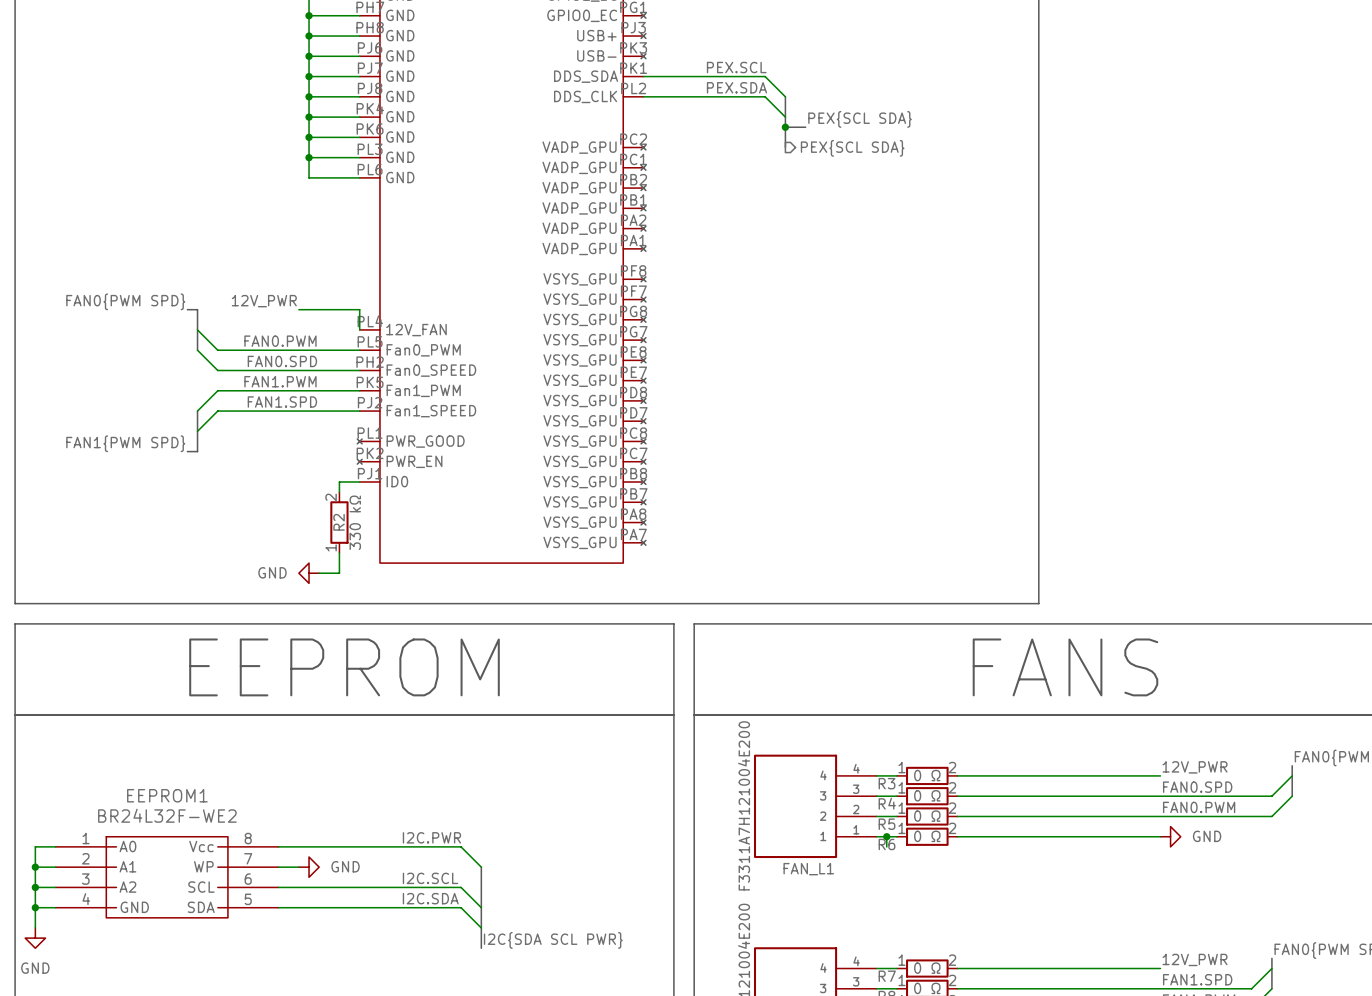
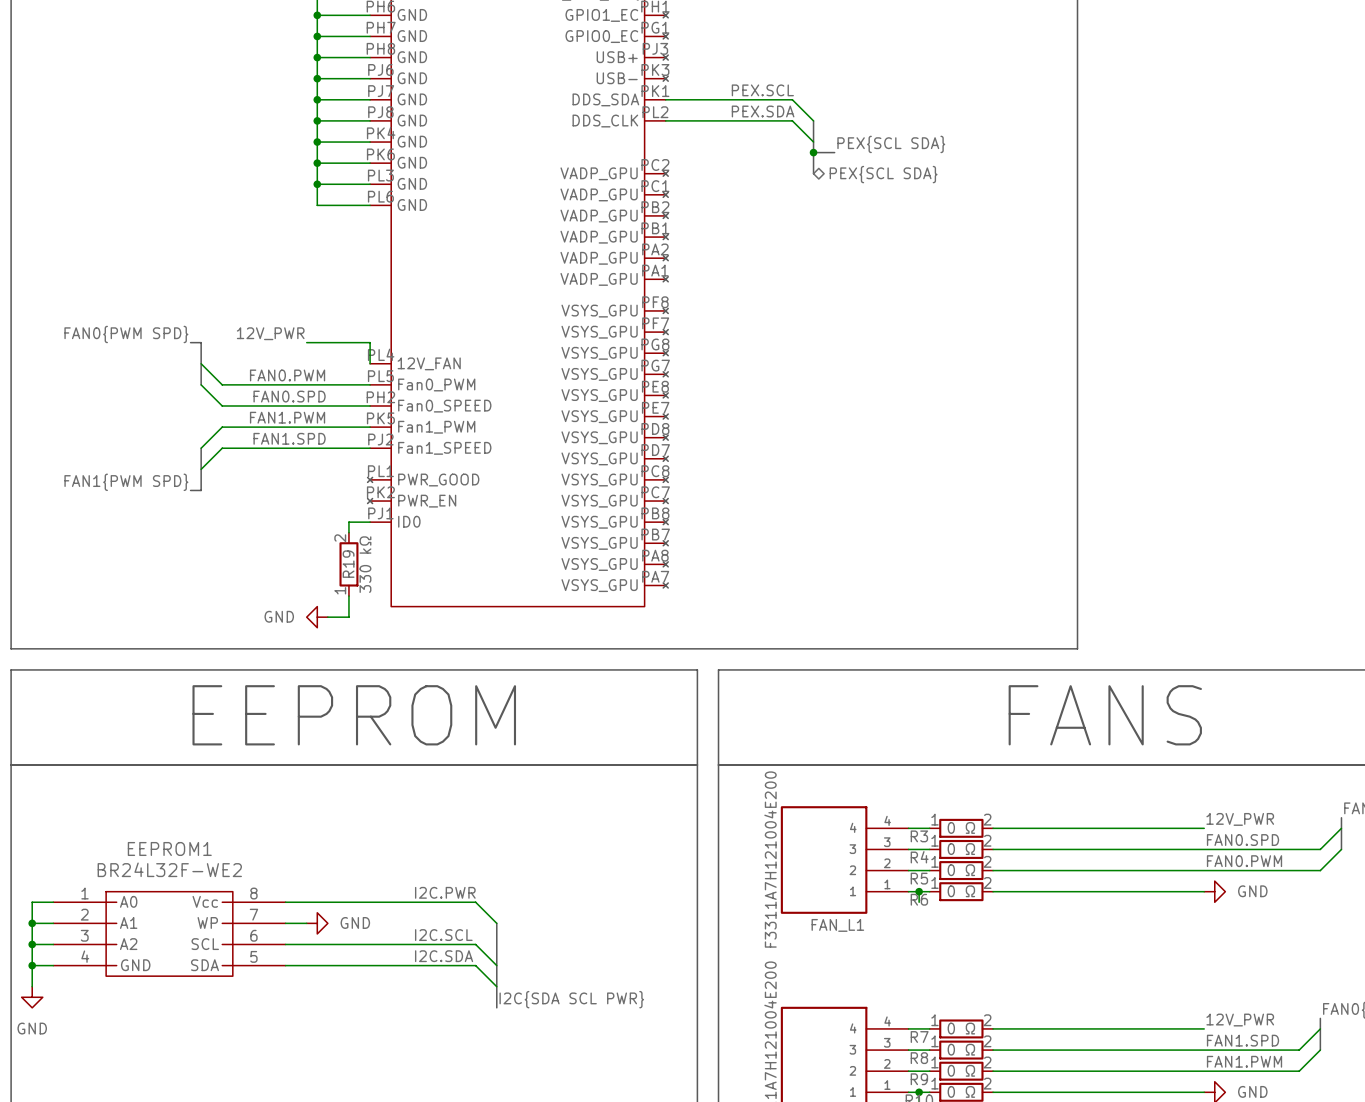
hierarchical label shape: output (852, 148) -> bidirectional (883, 174)
R2 name: R2 (339, 522) -> R19 (348, 564)

